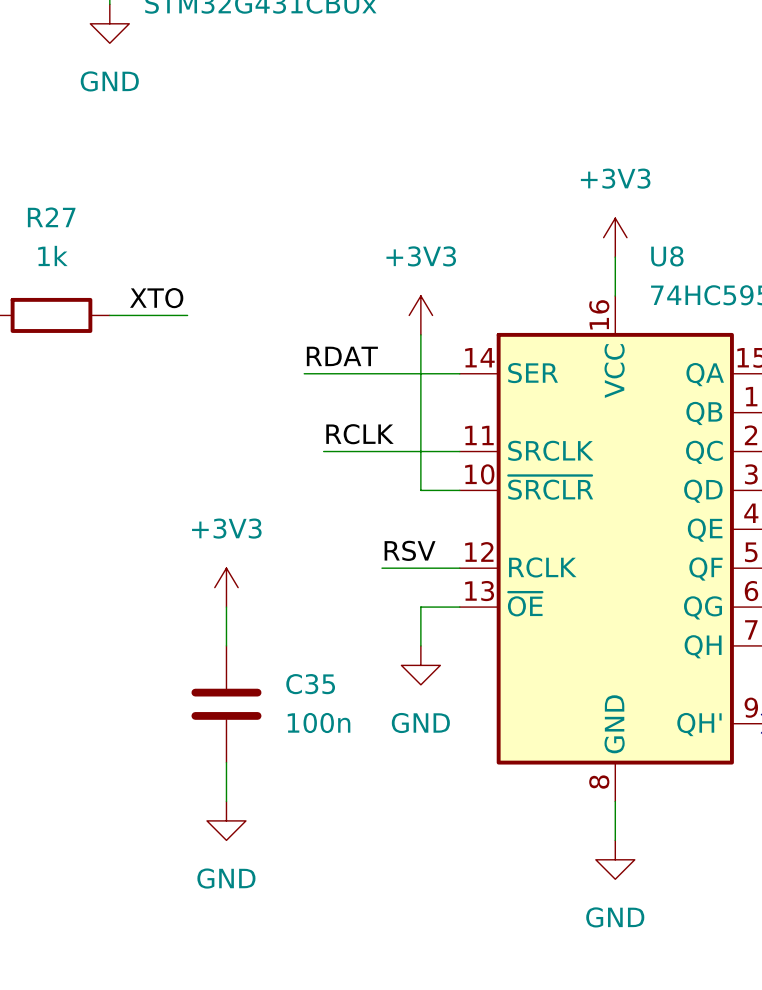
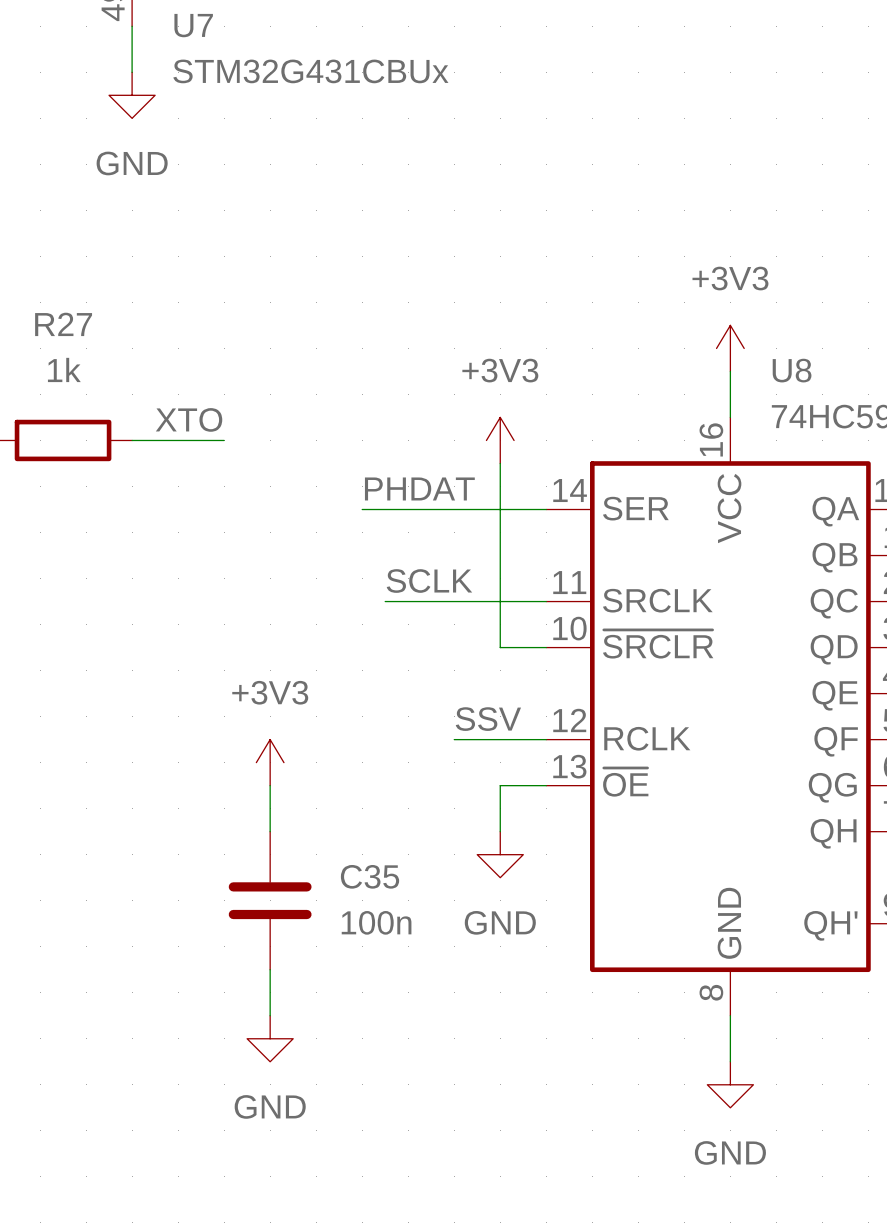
label: RDAT (342, 356) -> PHDAT (419, 488)
label: RCLK (360, 434) -> SCLK (429, 581)
label: RSV (410, 550) -> SSV (488, 719)

